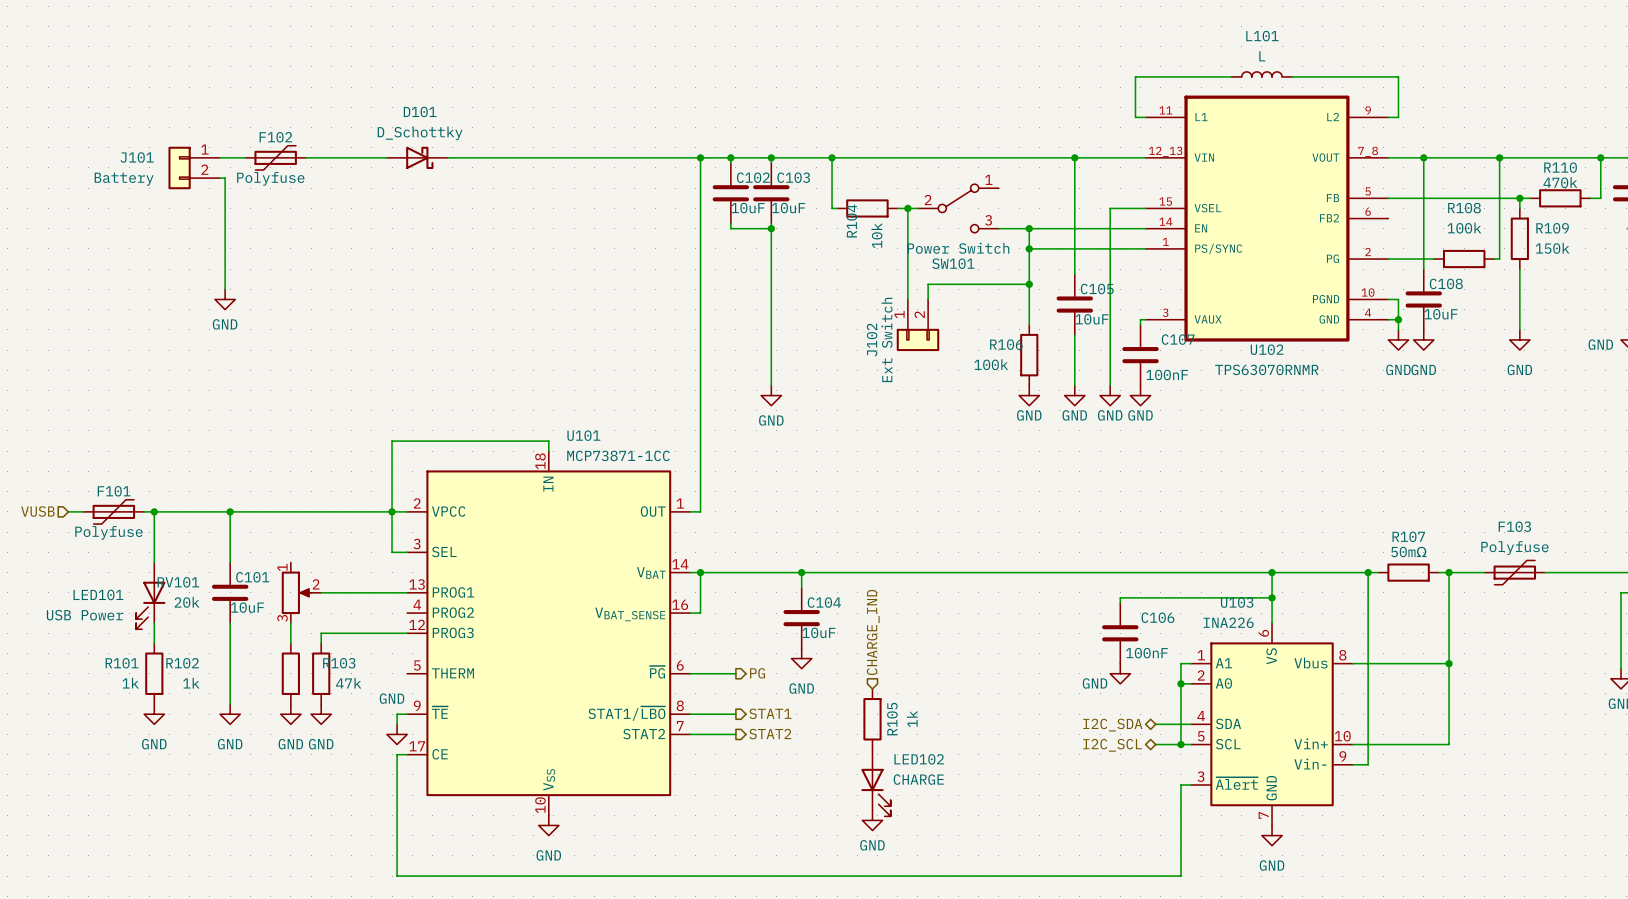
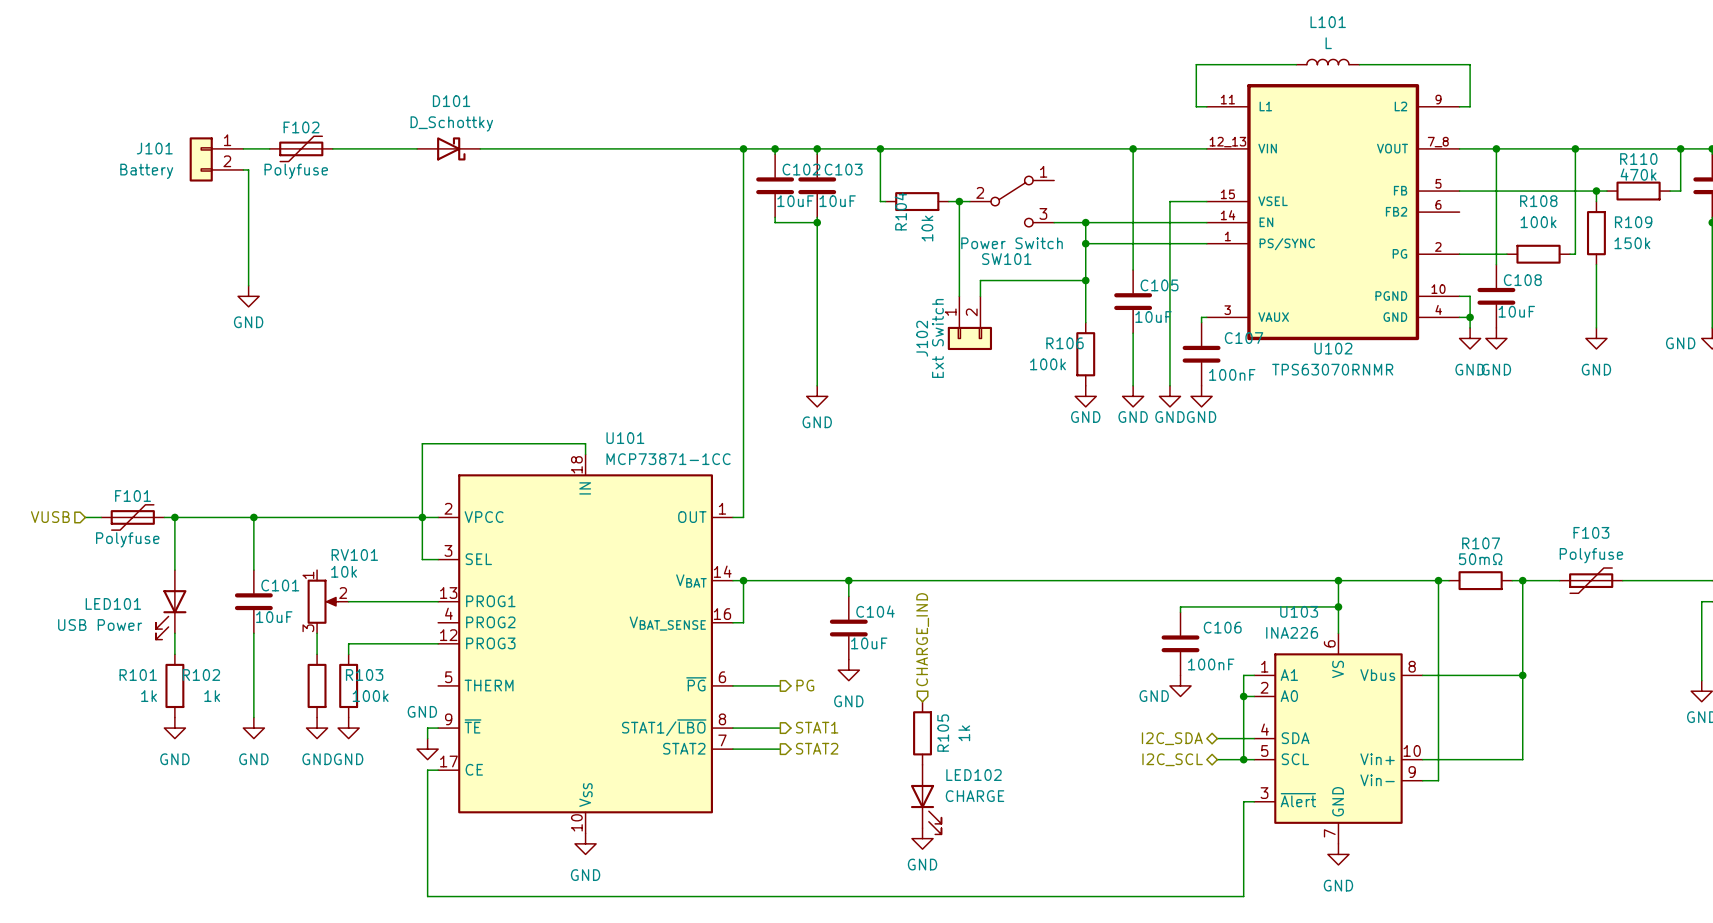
RV101 name position: RV101 (178, 582) -> RV101 (354, 554)
RV101 value: 20k (187, 602) -> 10k (344, 571)
R103 value: 47k (348, 683) -> 100k (370, 696)

